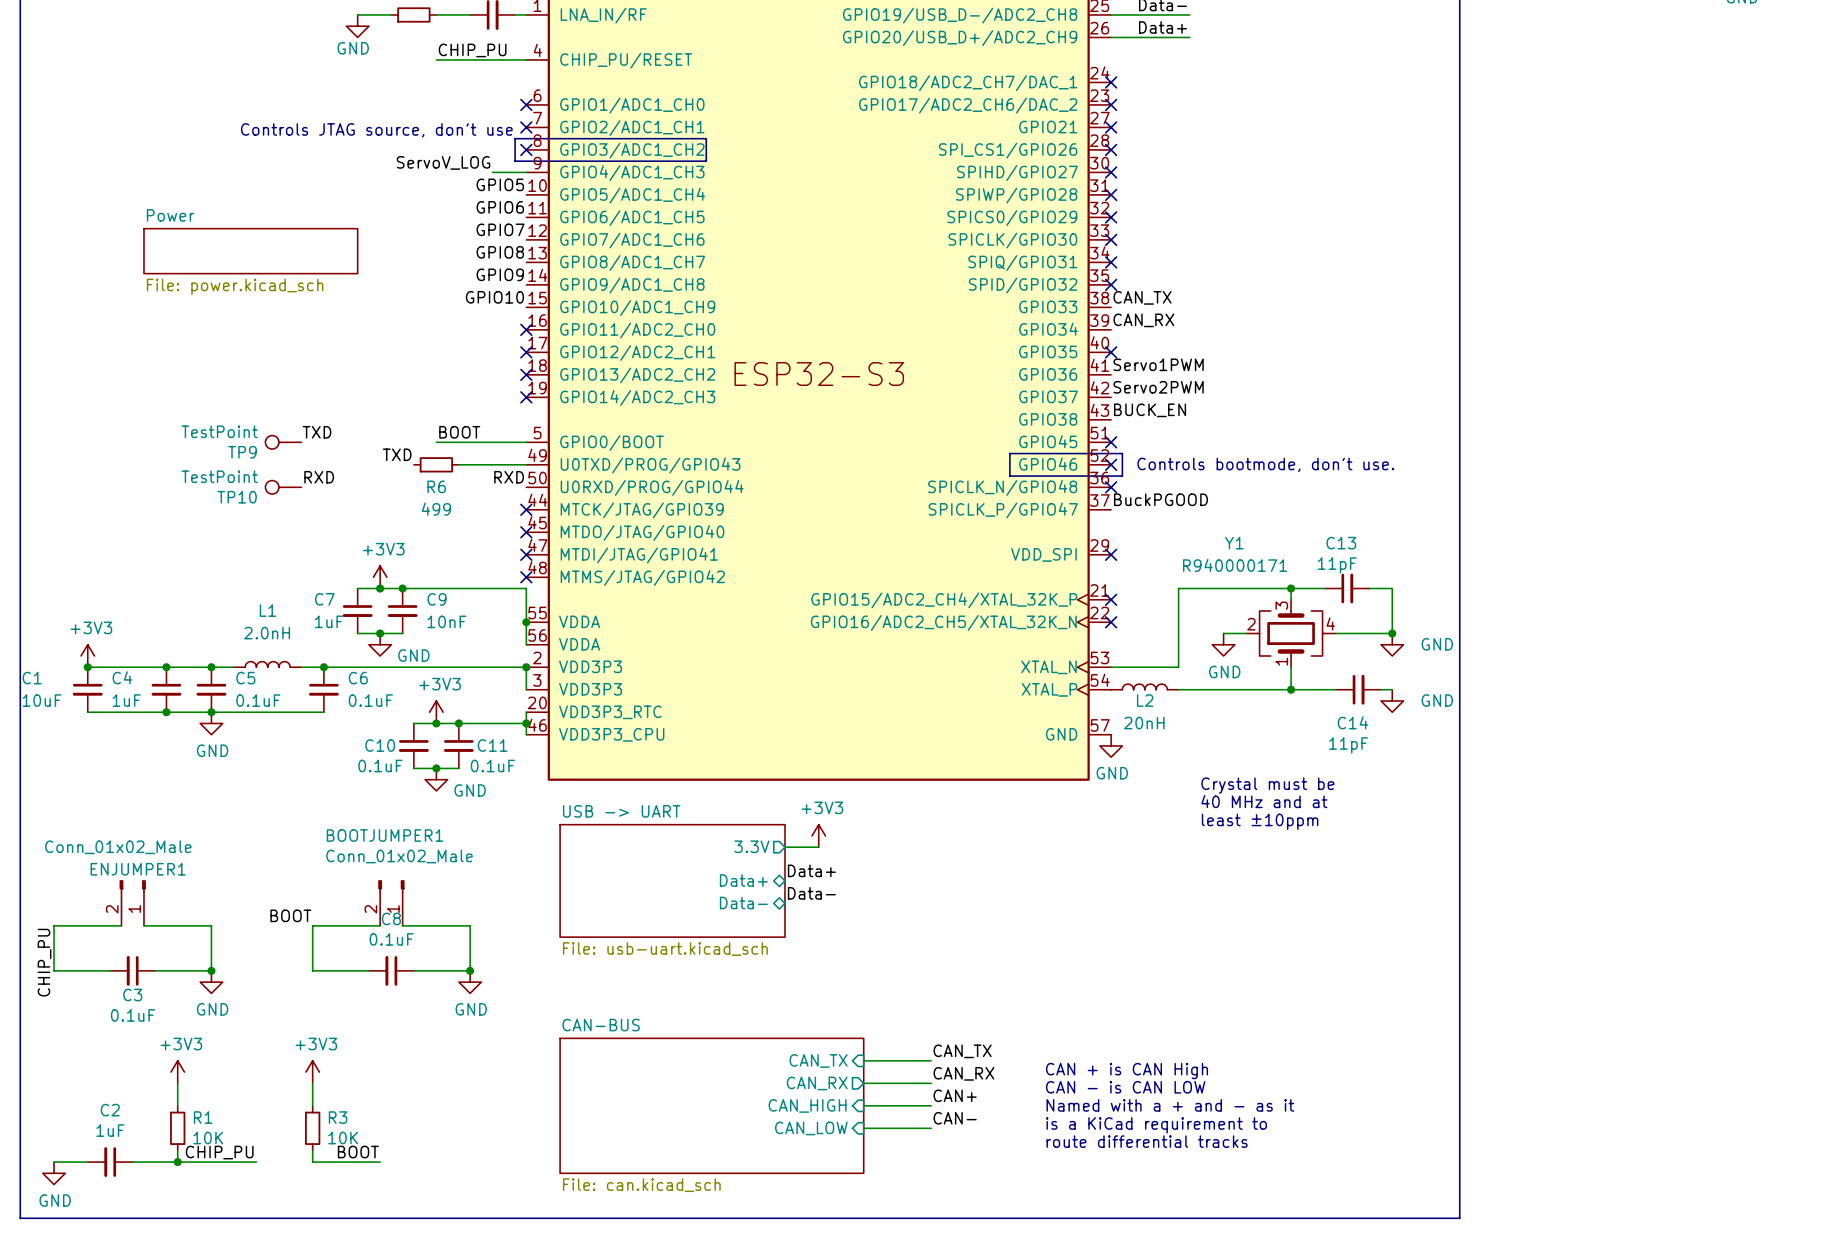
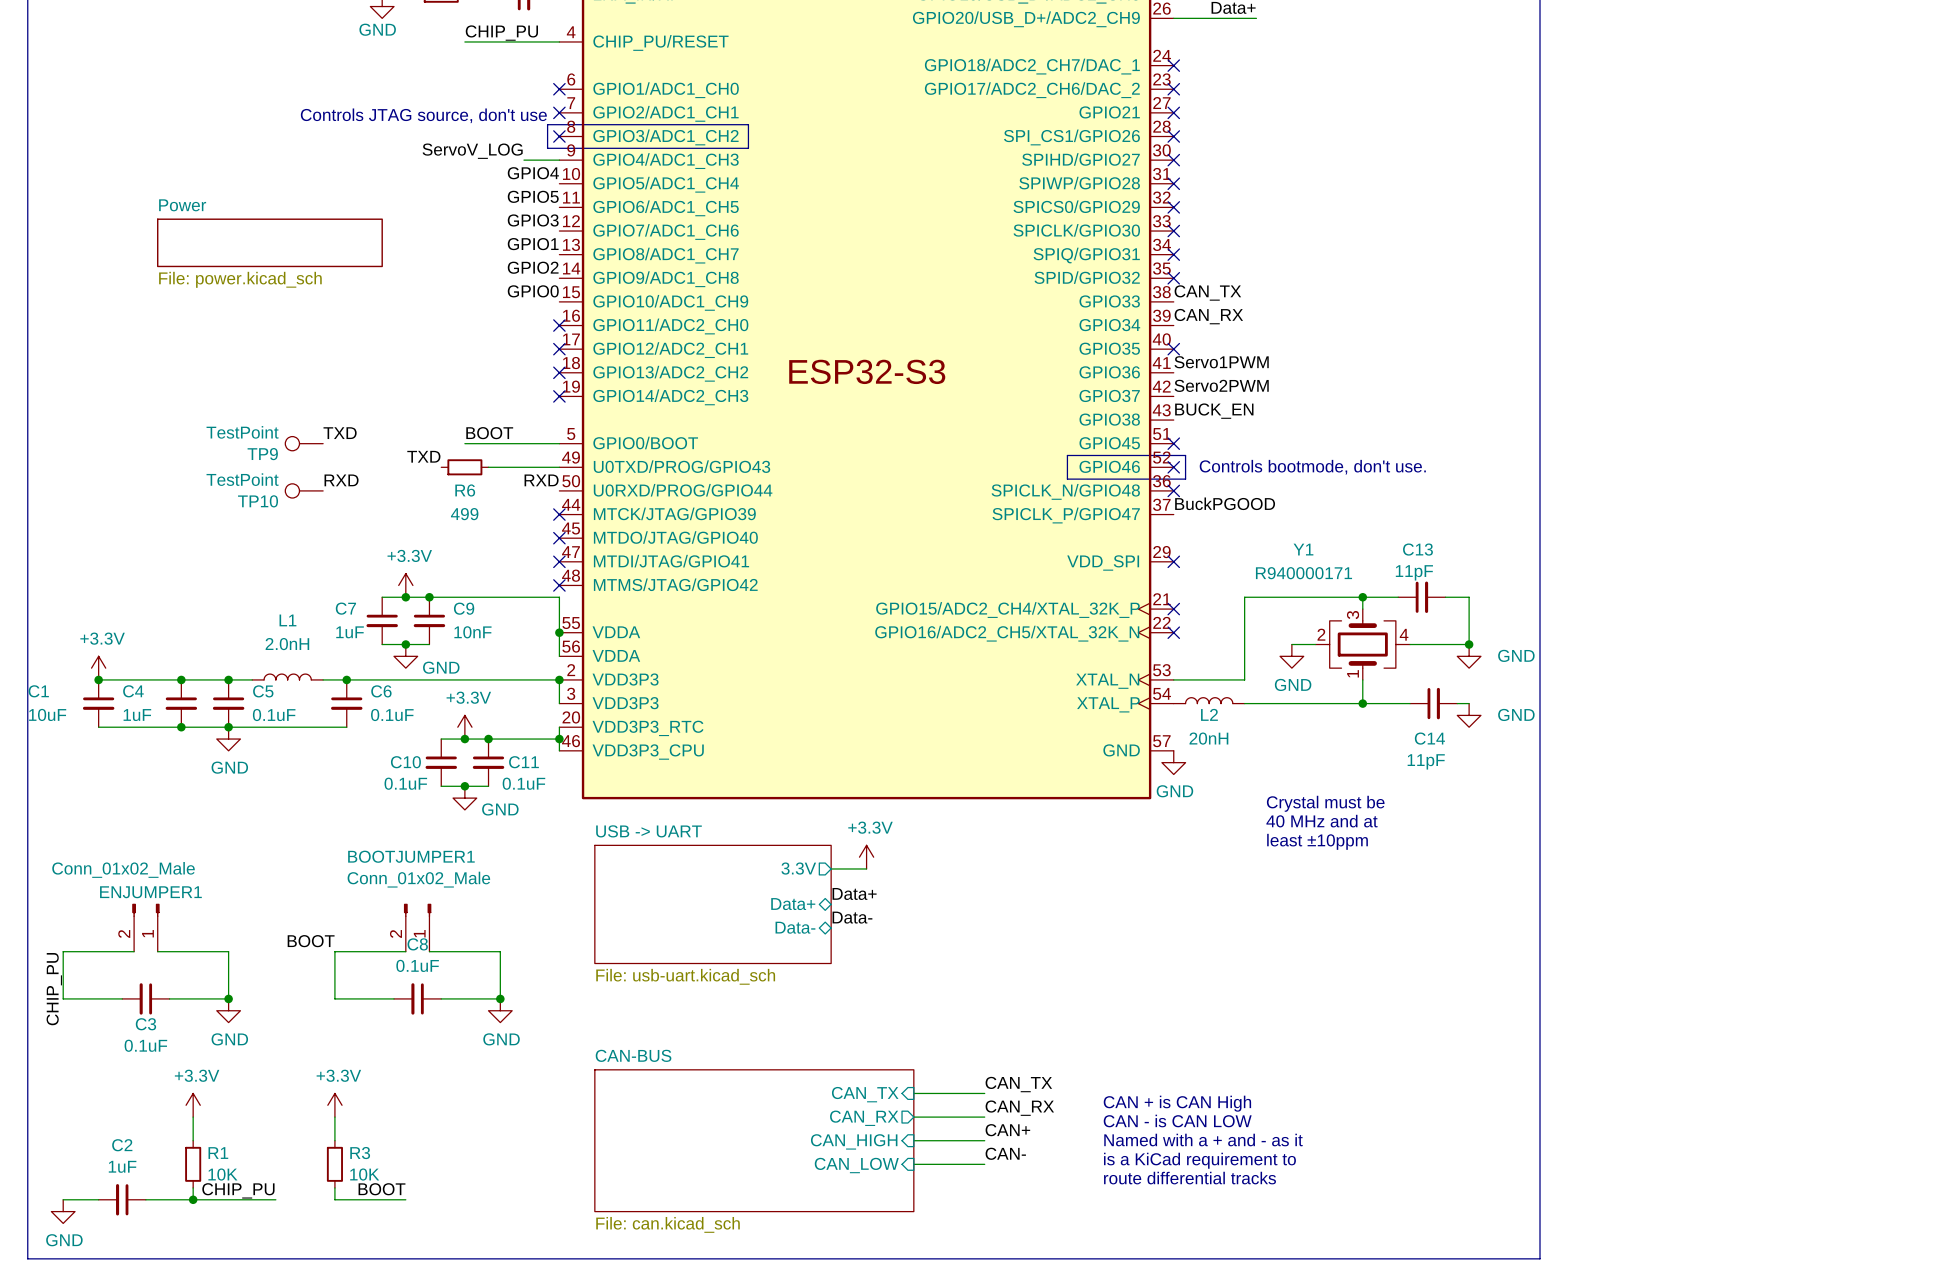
label: GPIO5 (500, 184) -> GPIO4 (533, 173)
label: GPIO6 (500, 207) -> GPIO5 (533, 196)
label: GPIO7 (500, 229) -> GPIO3 (533, 220)
label: GPIO8 (500, 252) -> GPIO1 (533, 244)
label: GPIO9 (500, 274) -> GPIO2 (533, 267)
label: GPIO10 (494, 297) -> GPIO0 (533, 291)
power symbol: +3V3 (380, 577) -> +3.3V (405, 585)
power symbol: +3V3 (87, 655) -> +3.3V (98, 668)
power symbol: +3V3 (436, 712) -> +3.3V (464, 727)
power symbol: +3V3 (818, 835) -> +3.3V (866, 857)
power symbol: +3V3 (177, 1072) -> +3.3V (193, 1105)
power symbol: +3V3 (312, 1072) -> +3.3V (334, 1105)

